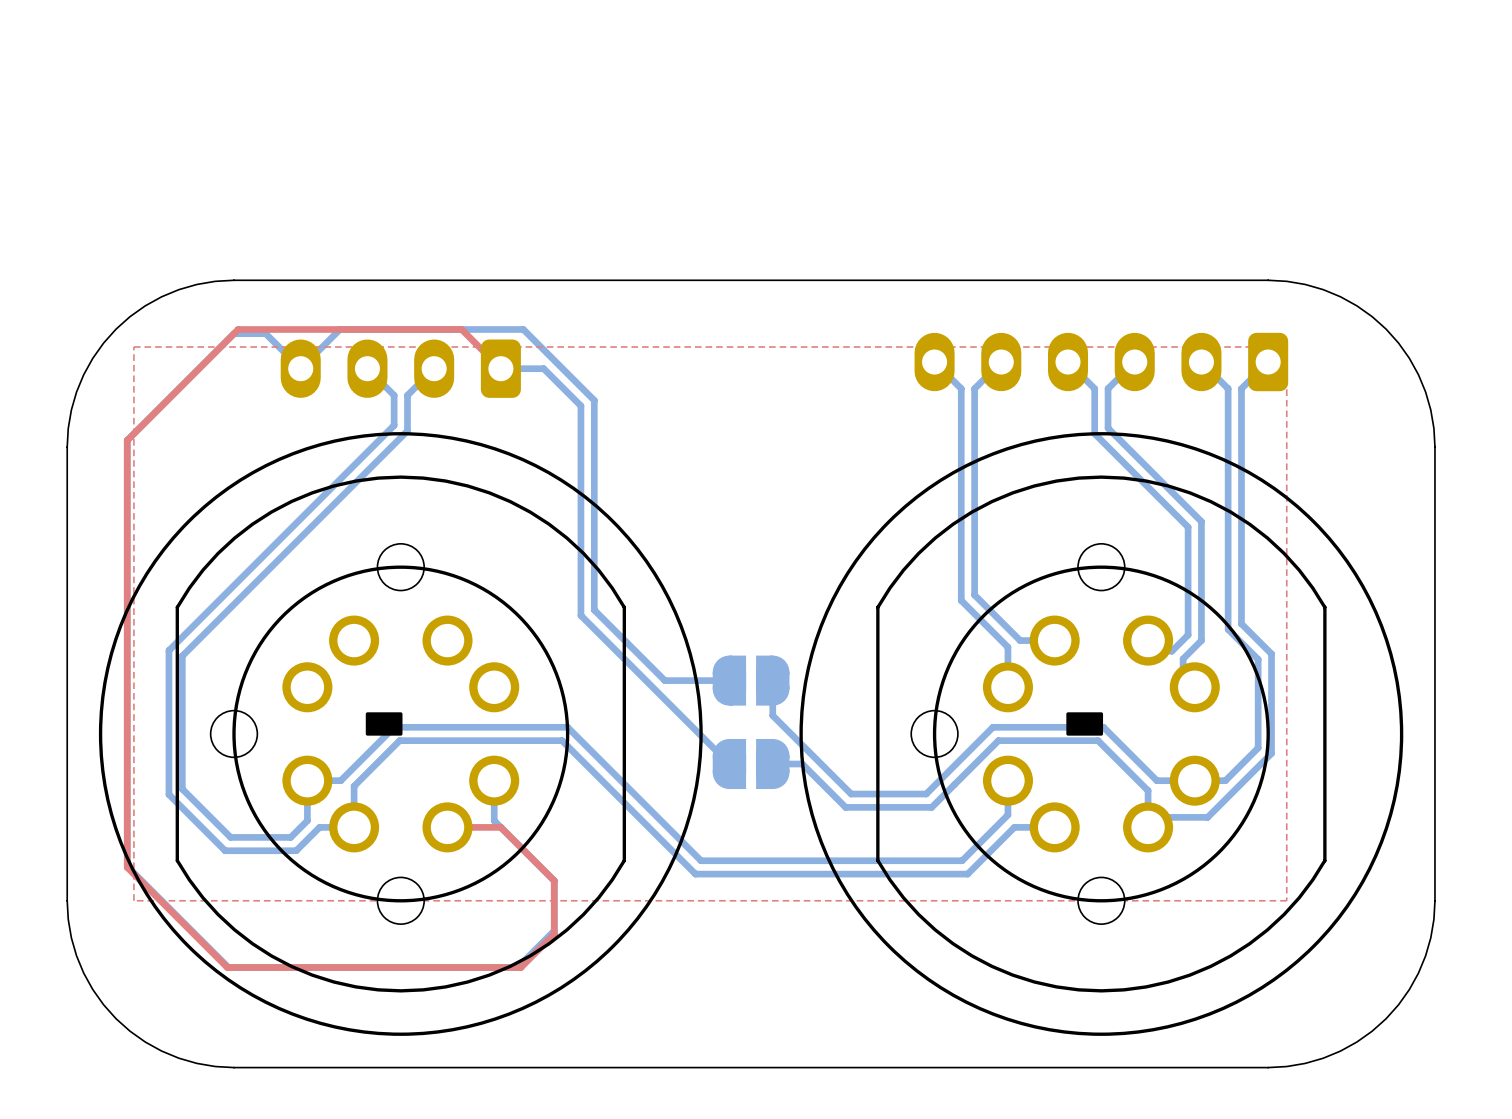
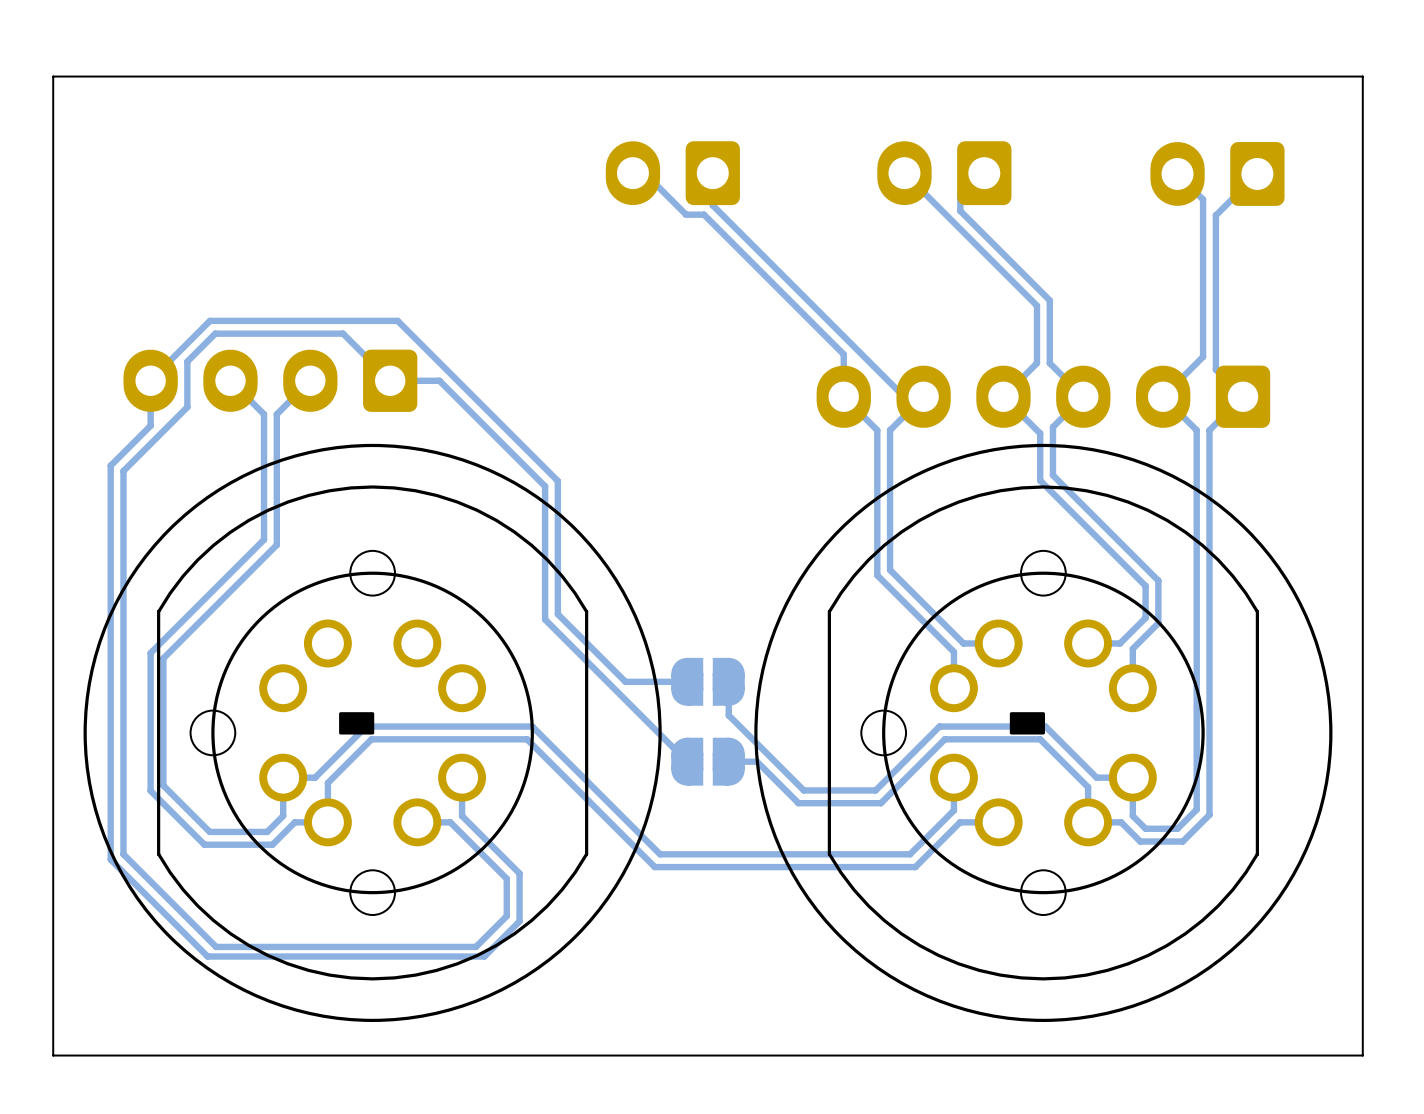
part: none -> (672, 173)
part: none -> (944, 173)
part: none -> (1217, 173)
part footprint: [914, 332, 1289, 392] -> [816, 365, 1271, 428]
top zone outline: (133, 347) (133, 900) (1286, 900) (1286, 347) (133, 347) -> none
bottom track: (934, 362) (961, 388) (961, 600) (1007, 647) (1007, 649) -> (632, 173) (644, 173) (686, 214) (704, 214) (843, 354) (843, 396) (877, 430) (877, 575) (953, 651)
bottom track: (1001, 362) (974, 388) (974, 595) (1020, 640) -> (712, 173) (712, 205) (904, 396) (923, 396) (890, 430) (890, 570) (965, 643)
bottom track: (1068, 362) (1094, 388) (1094, 433) (1188, 527) (1188, 635) (1172, 651) (1158, 651) (1148, 640) -> (904, 173) (1036, 305) (1036, 363) (1003, 396) (1040, 433) (1040, 480) (1145, 586) (1145, 617) (1120, 643) (1088, 643)
bottom track: (1134, 362) (1108, 388) (1108, 428) (1201, 521) (1201, 640) (1183, 658) (1183, 675) (1194, 687) -> (984, 173) (960, 197) (960, 210) (1049, 300) (1049, 363) (1083, 396) (1052, 427) (1052, 475) (1158, 580) (1158, 623) (1132, 648) (1132, 688)
bottom track: (1201, 362) (1228, 388) (1228, 629) (1258, 659) (1258, 747) (1225, 780) (1194, 780) -> (1177, 173) (1203, 199) (1203, 356) (1163, 396) (1196, 430) (1196, 809) (1177, 828) (1145, 828) (1132, 815) (1132, 777)
bottom track: (1268, 362) (1241, 388) (1241, 623) (1271, 653) (1271, 753) (1207, 817) (1158, 817) (1148, 827) -> (1257, 173) (1215, 215) (1215, 369) (1243, 396) (1209, 430) (1209, 814) (1182, 841) (1140, 841) (1121, 822) (1088, 822)
part: none -> (270, 380)
bottom track: (367, 368) (394, 395) (394, 425) (287, 532) -> (230, 380) (264, 414) (264, 539)
part: (400, 368) -> none
bottom track: (434, 368) (407, 395) (407, 430) (300, 537) -> (310, 380) (276, 414) (276, 544)
bottom track: (500, 368) (543, 368) (580, 405) (580, 476) -> (417, 822) (450, 822) (506, 878) (506, 916) (475, 946) (216, 946) (123, 854) (123, 471) (187, 407) (187, 361) (215, 333) (343, 333) (390, 380) (439, 380) (545, 486)
top track: (500, 368) (461, 329) (238, 329) (127, 440) (127, 867) (227, 967) (520, 967) (554, 934) (554, 880) (500, 827) (447, 827) -> none
board edge: (67, 447) (71, 409) (83, 374) (103, 343) (116, 329) (145, 305) (178, 289) (215, 281) (234, 280) (1286, 281) (1323, 289) (1340, 296) (1372, 316) (1386, 329) (1409, 358) (1418, 374) (1430, 409) (1434, 447) -> (53, 458) (53, 76) (1362, 76) (1362, 458)
bottom track: (127, 454) (127, 440) (234, 333) (265, 333) (300, 368) (339, 329) (523, 329) (594, 400) (594, 470) -> (110, 465) (150, 425) (150, 380) (209, 320) (397, 320) (557, 481)
board edge: (67, 900) (68, 919) (76, 955) (92, 989) (116, 1018) (145, 1042) (178, 1058) (196, 1063) (234, 1067) (1286, 1066) (1305, 1063) (1340, 1051) (1372, 1031) (1386, 1018) (1409, 989) (1425, 955) (1430, 937) (1434, 900) -> (53, 892) (53, 1055) (1362, 1055) (1362, 892)

